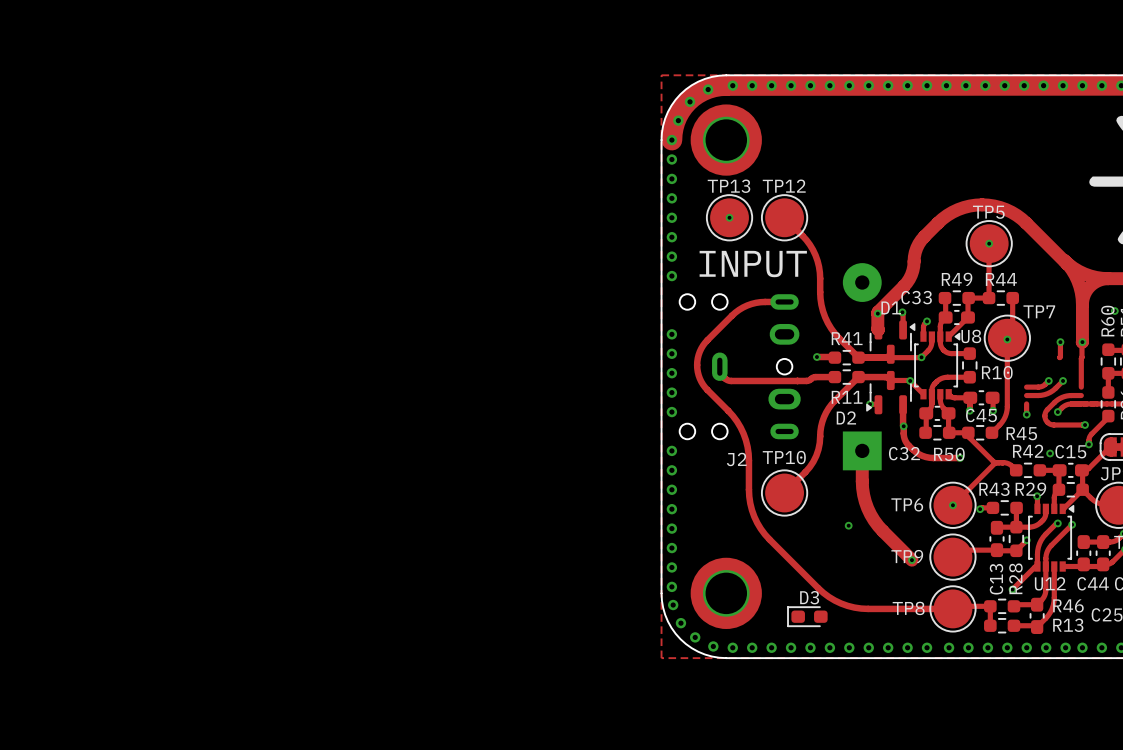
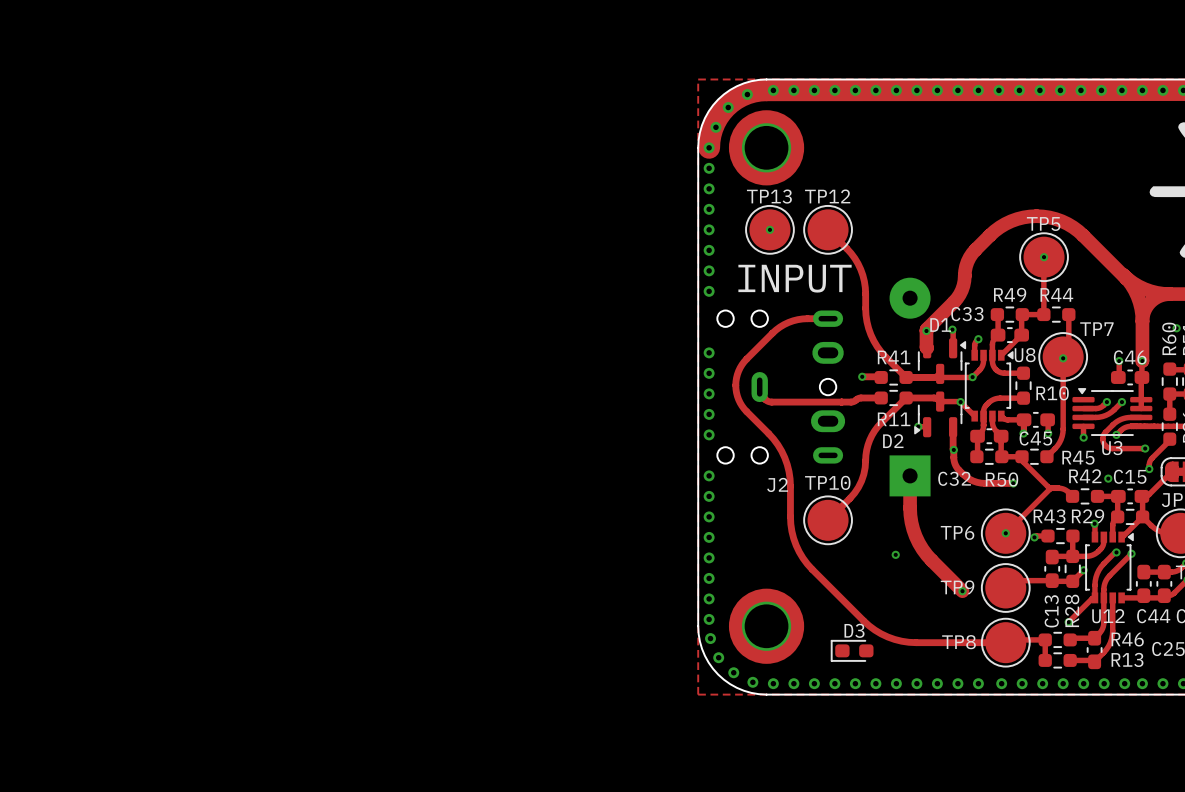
C46: none -> (1130, 377)
U3: none -> (1112, 411)

